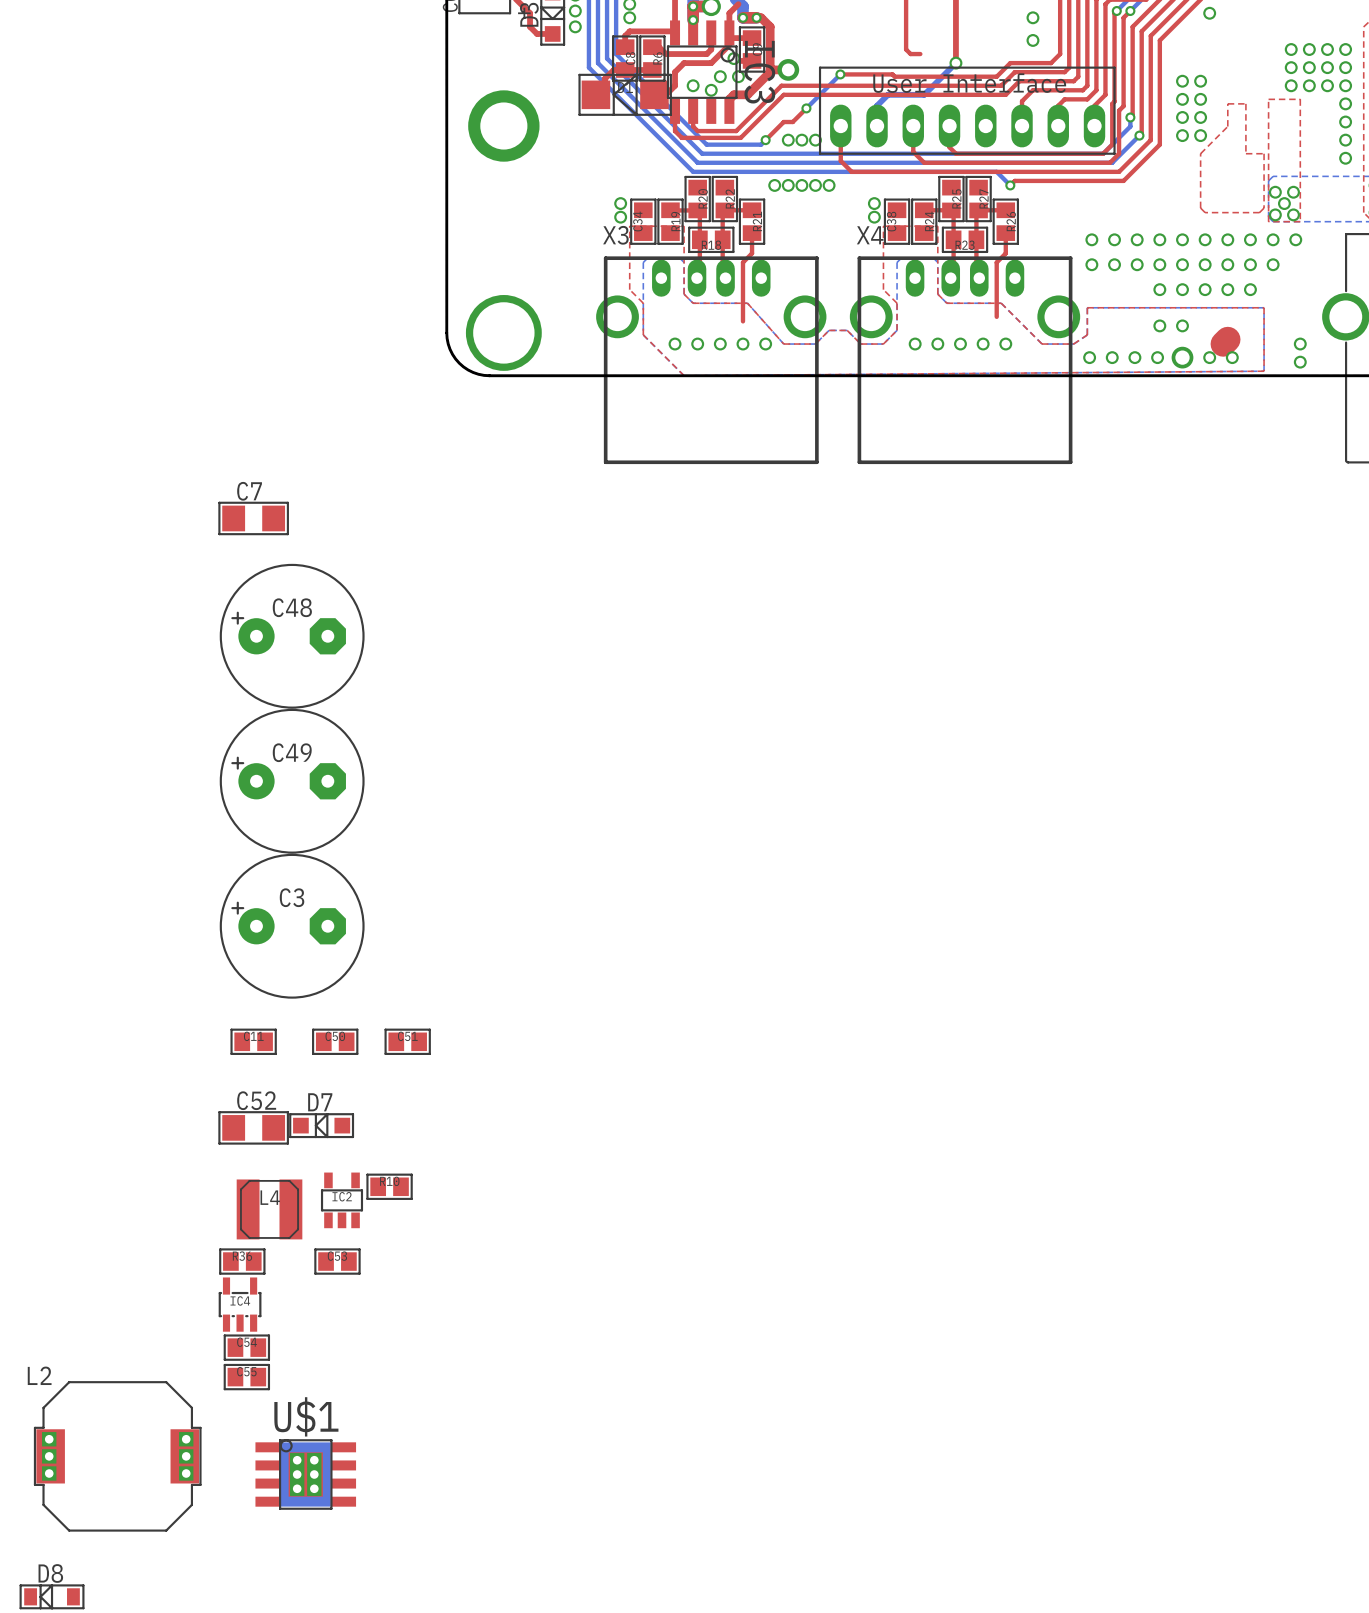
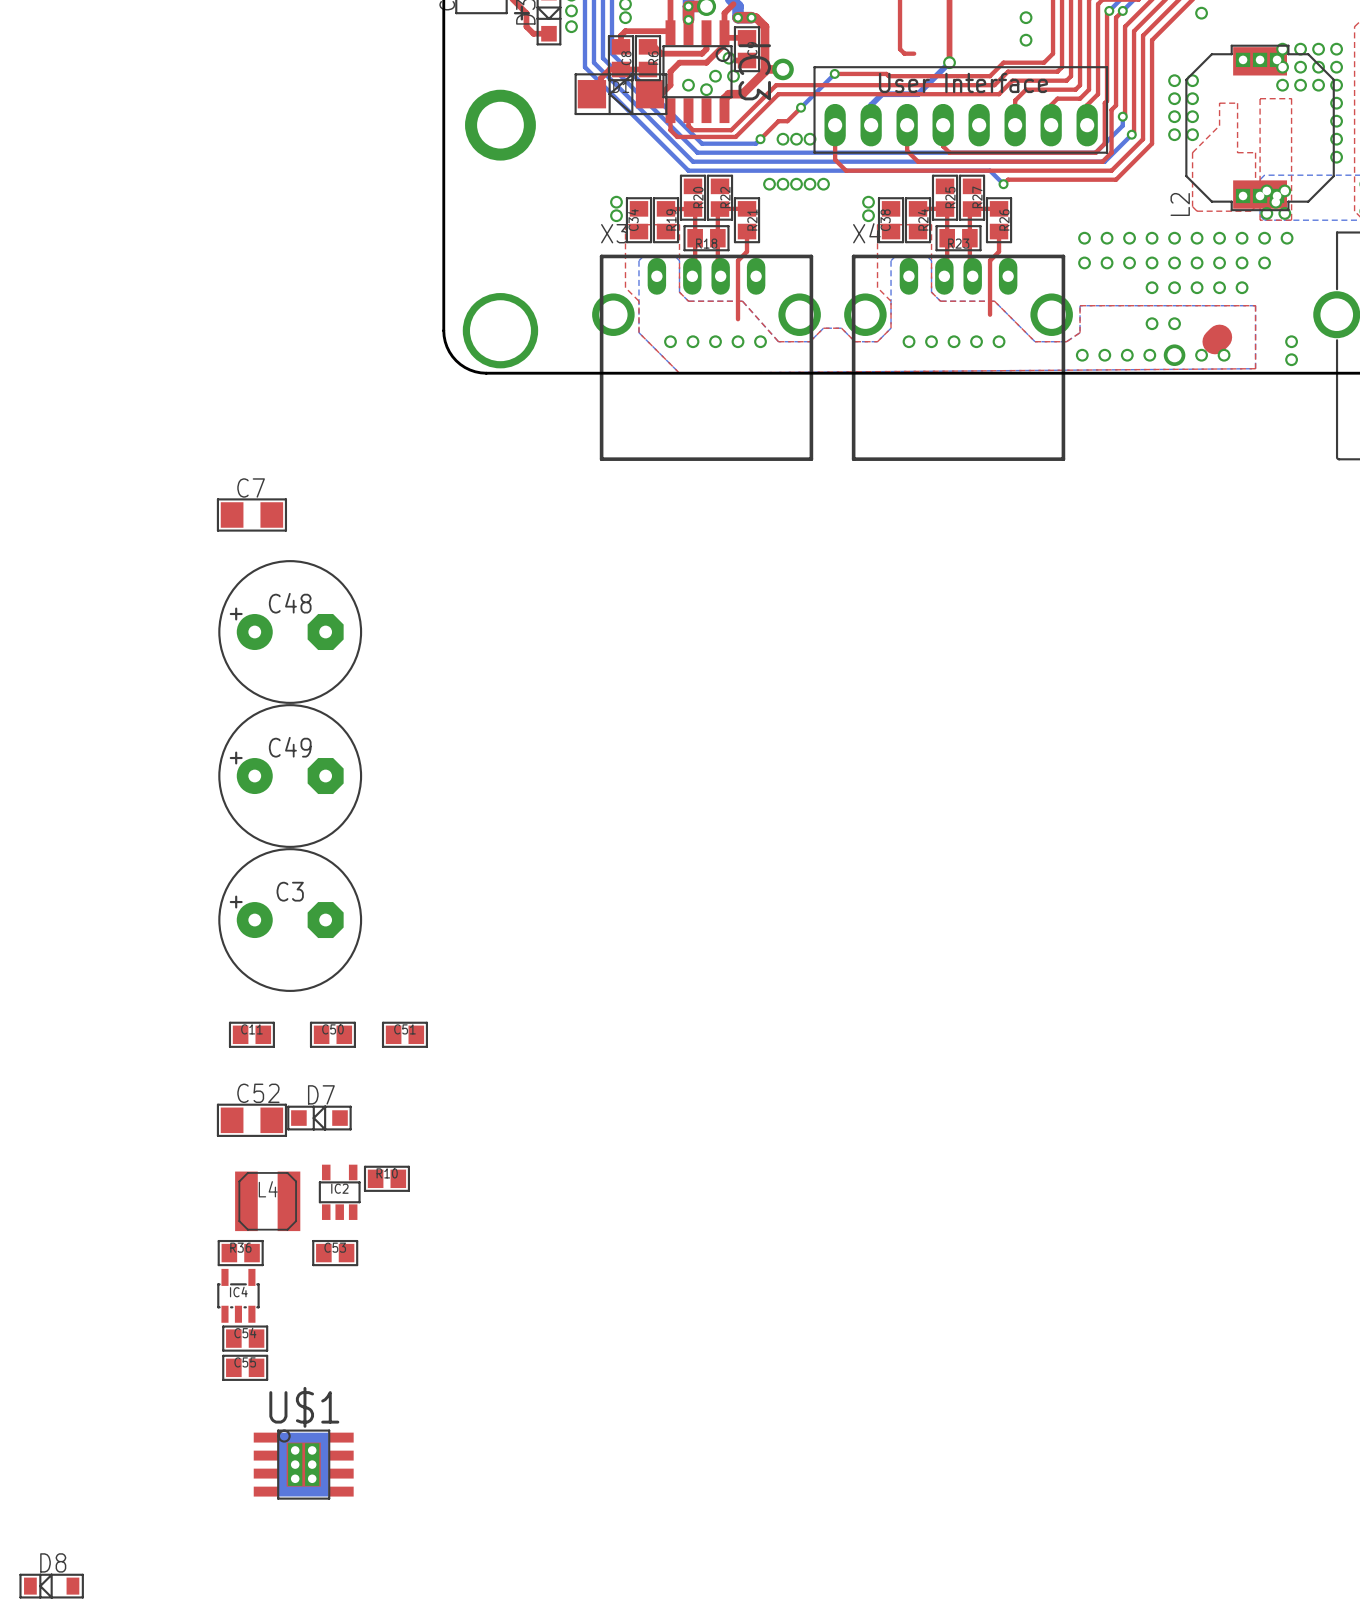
L2 name position: L2 (39, 1375) -> L2 (1180, 204)
L2 rotation: 0° (117, 1456) -> 90° clockwise (1260, 127)
L2 position: (117, 1456) -> (1260, 127)

